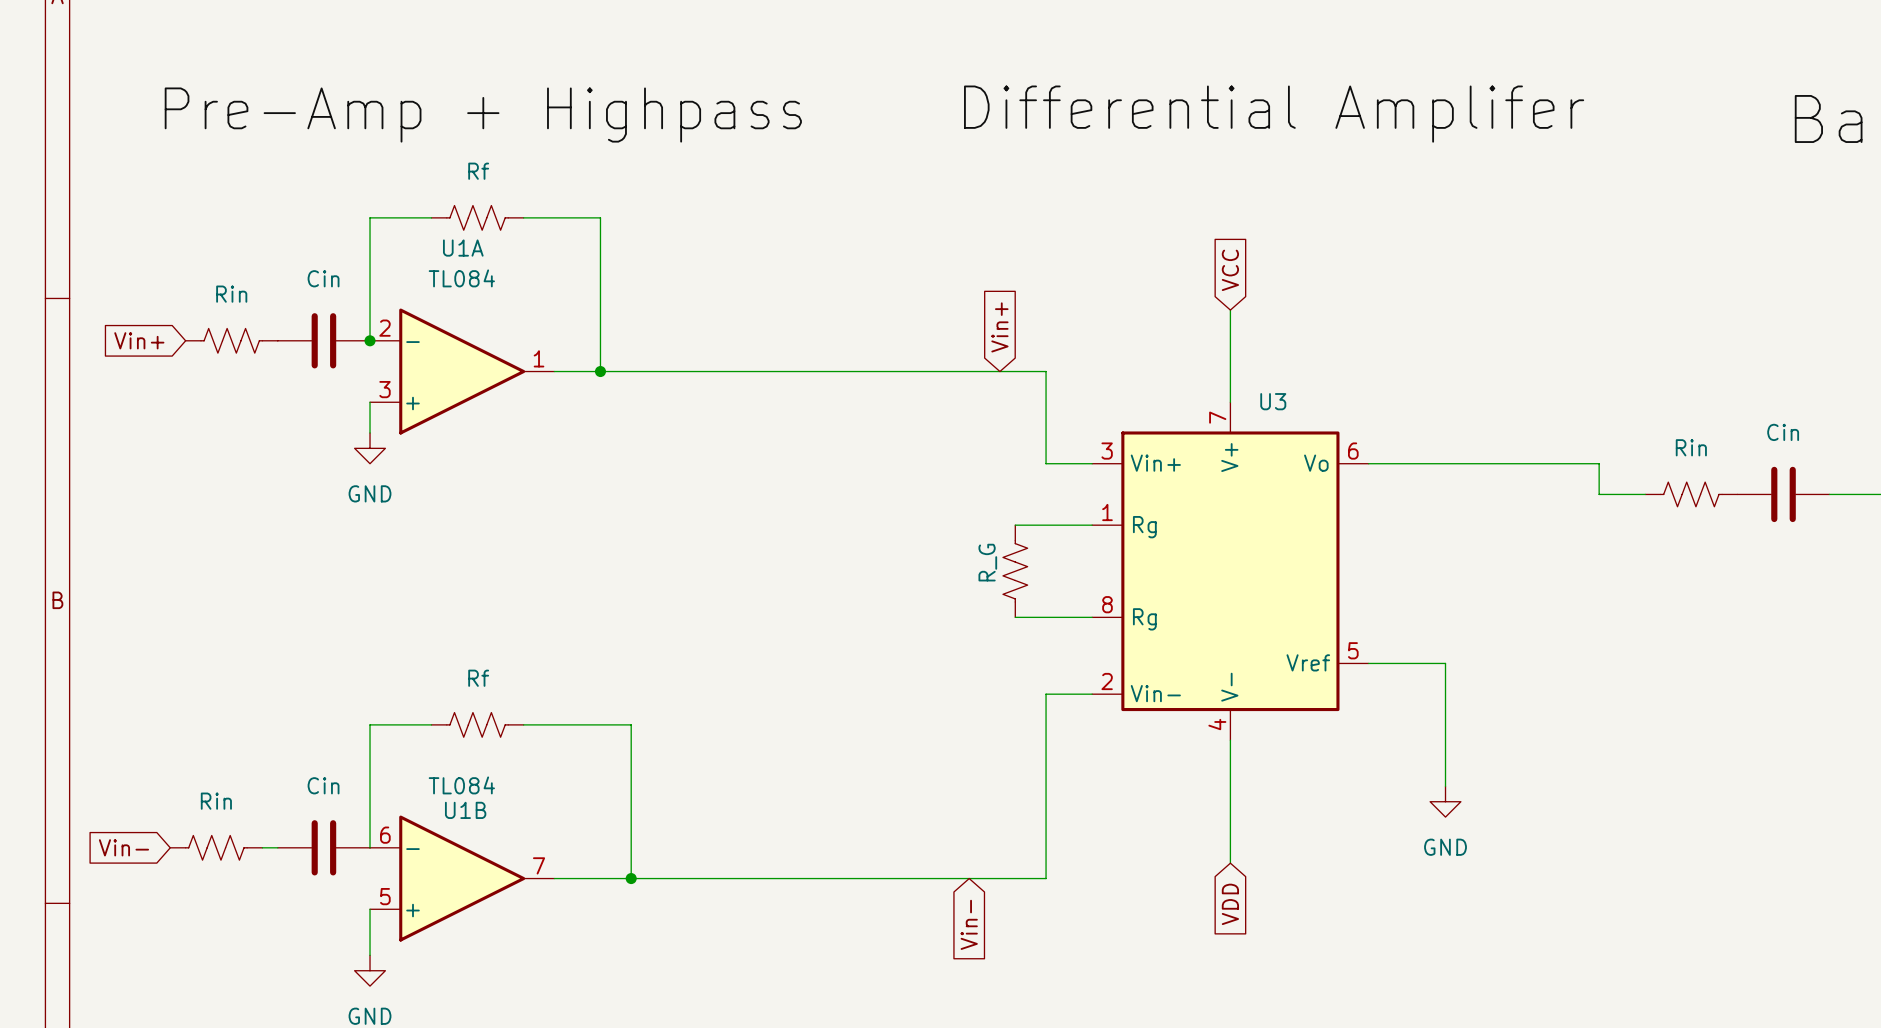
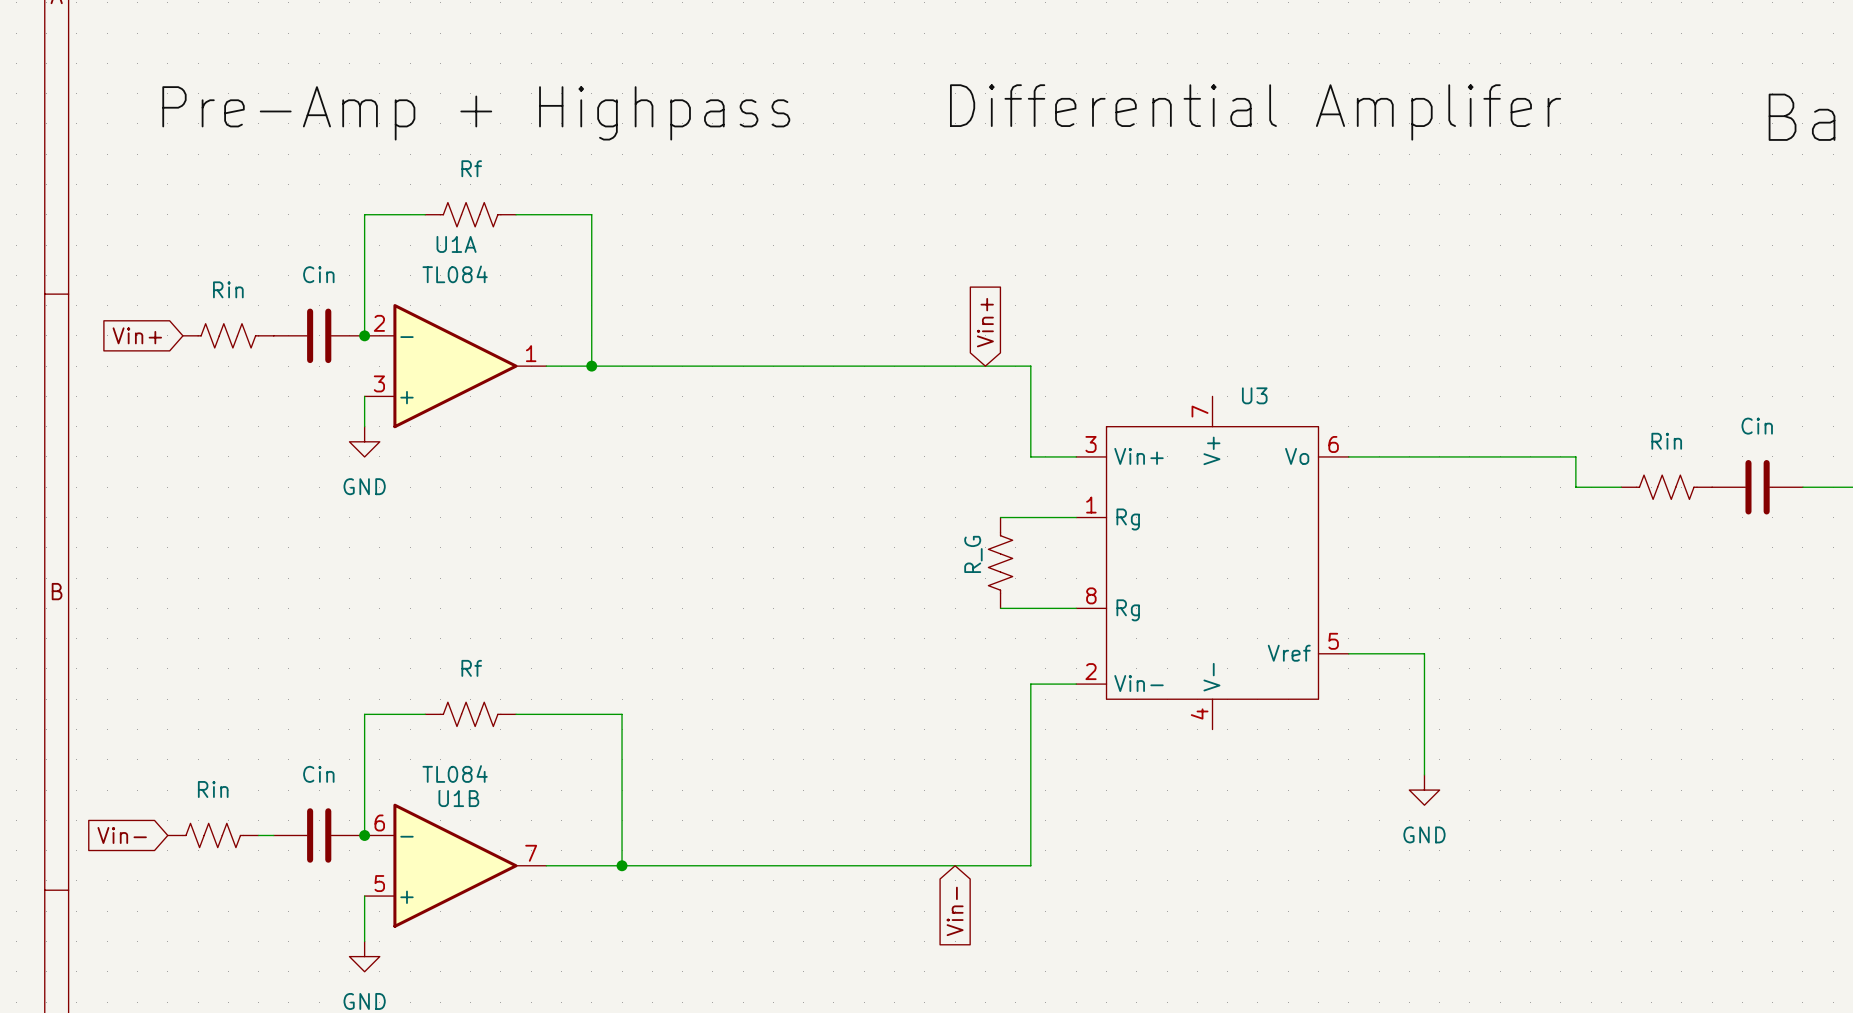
global label: VCC (1230, 270) -> none
wire: (1230, 310) (1230, 402) -> none
U3 symbol: [1092, 402, 1369, 741] -> [1076, 396, 1349, 730]
wire: (1230, 740) (1230, 863) -> none
junction: none -> (364, 835)
global label: VDD (1230, 904) -> none

